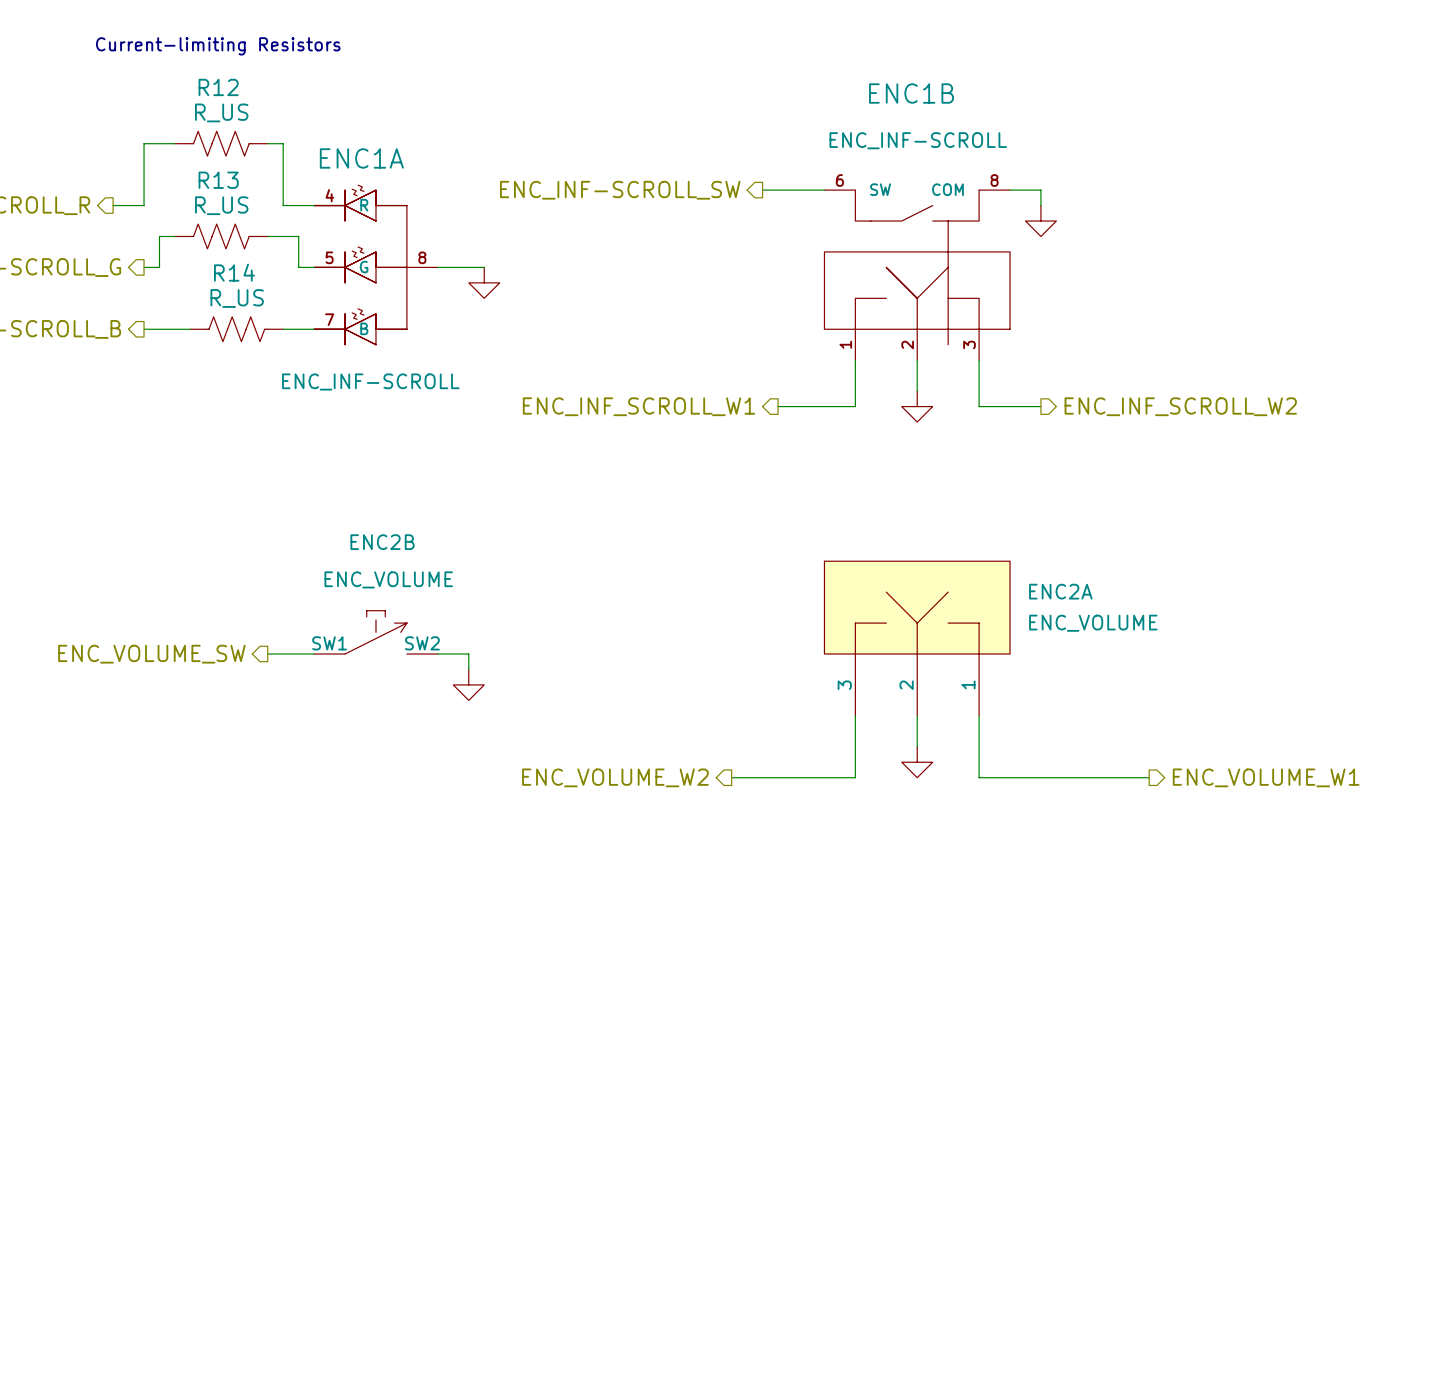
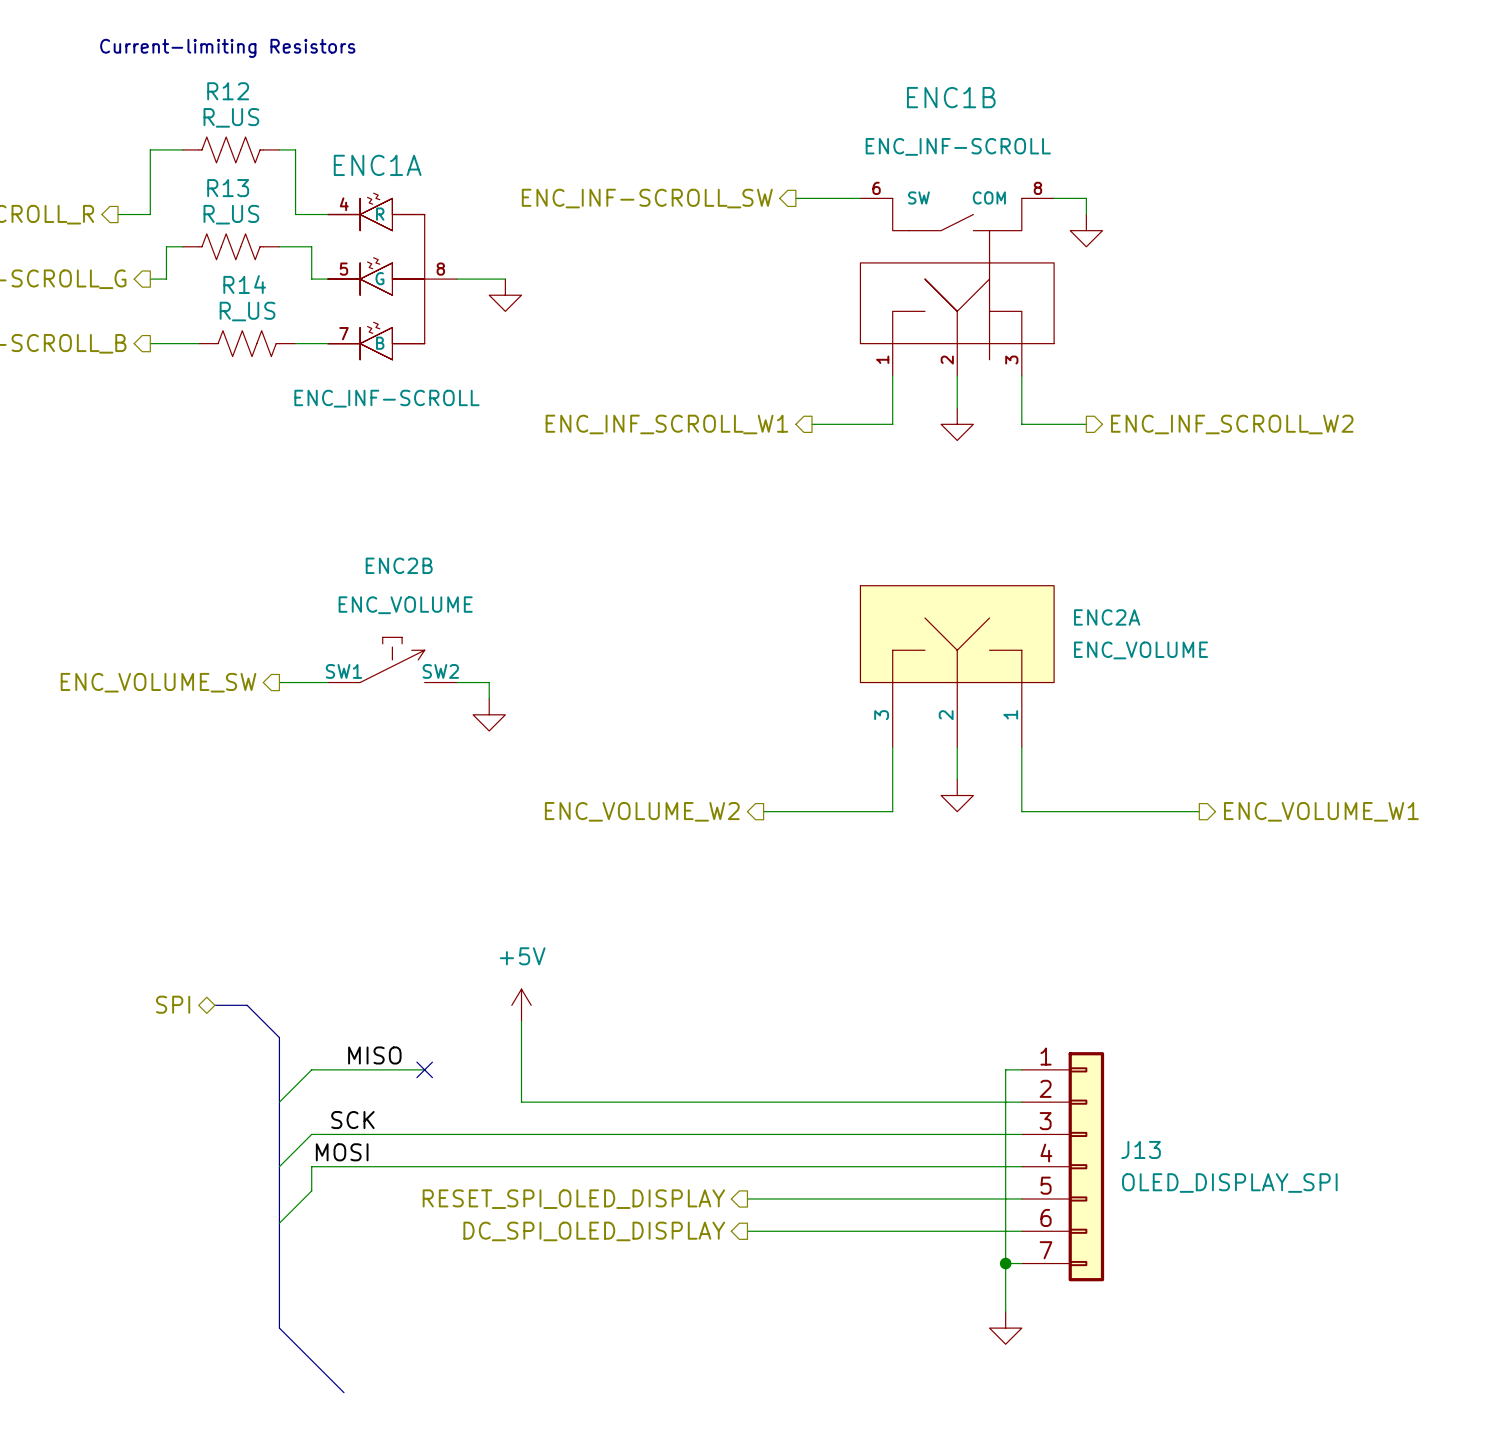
hierarchical label: none -> SPI (173, 1004)
bus: none -> (214, 1005) (247, 1005) (279, 1037) (279, 1328) (343, 1392)
power symbol: none -> +5V (521, 1005)
wire: none -> (521, 1021) (521, 1102) (1021, 1102)
label: none -> MISO (374, 1055)
wire: none -> (424, 1069) (311, 1069) (279, 1102)
no-connect mark: none -> (424, 1069)
wire: none -> (1021, 1069) (1005, 1069) (1005, 1311)
label: none -> SCK (352, 1120)
wire: none -> (1021, 1134) (311, 1134) (279, 1166)
label: none -> MOSI (342, 1152)
wire: none -> (1021, 1166) (311, 1166) (311, 1190) (279, 1223)
J13: none -> OLED_DISPLAY_SPI (1062, 1166)
wire: none -> (747, 1198) (1021, 1198)
hierarchical label: none -> RESET_SPI_OLED_DISPLAY (573, 1199)
hierarchical label: none -> DC_SPI_OLED_DISPLAY (594, 1231)
wire: none -> (747, 1231) (1021, 1231)
wire: none -> (1005, 1263) (1021, 1263)
junction: none -> (1005, 1263)
power symbol: none -> (1005, 1328)

